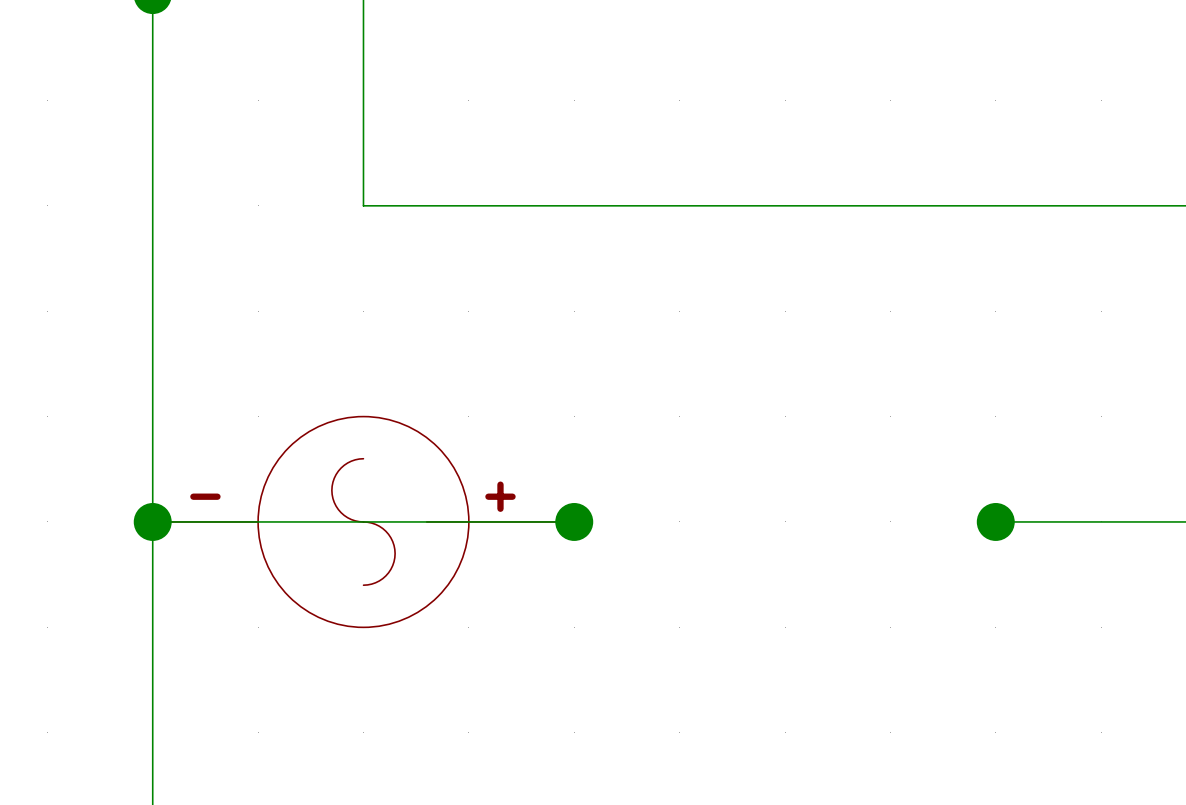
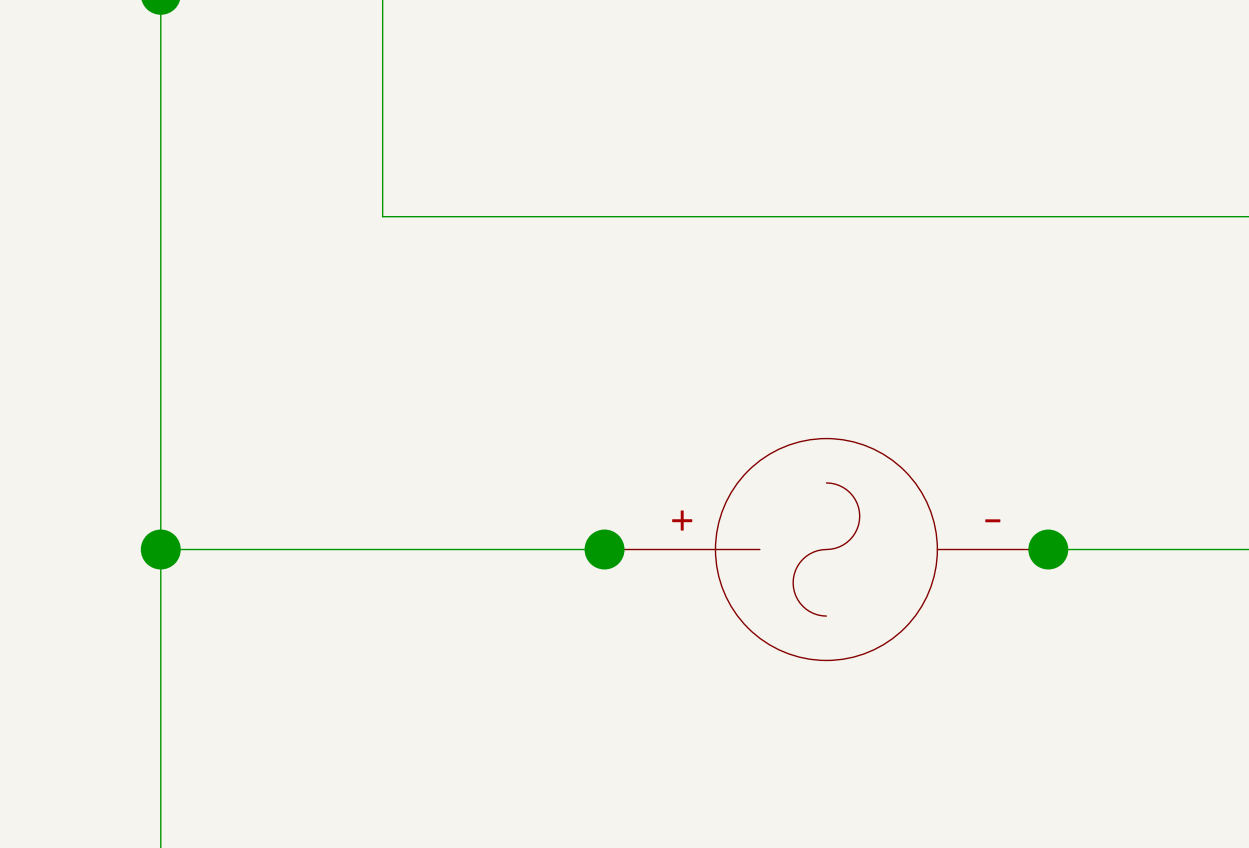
part: (363, 521) -> none
part: none -> (826, 549)

